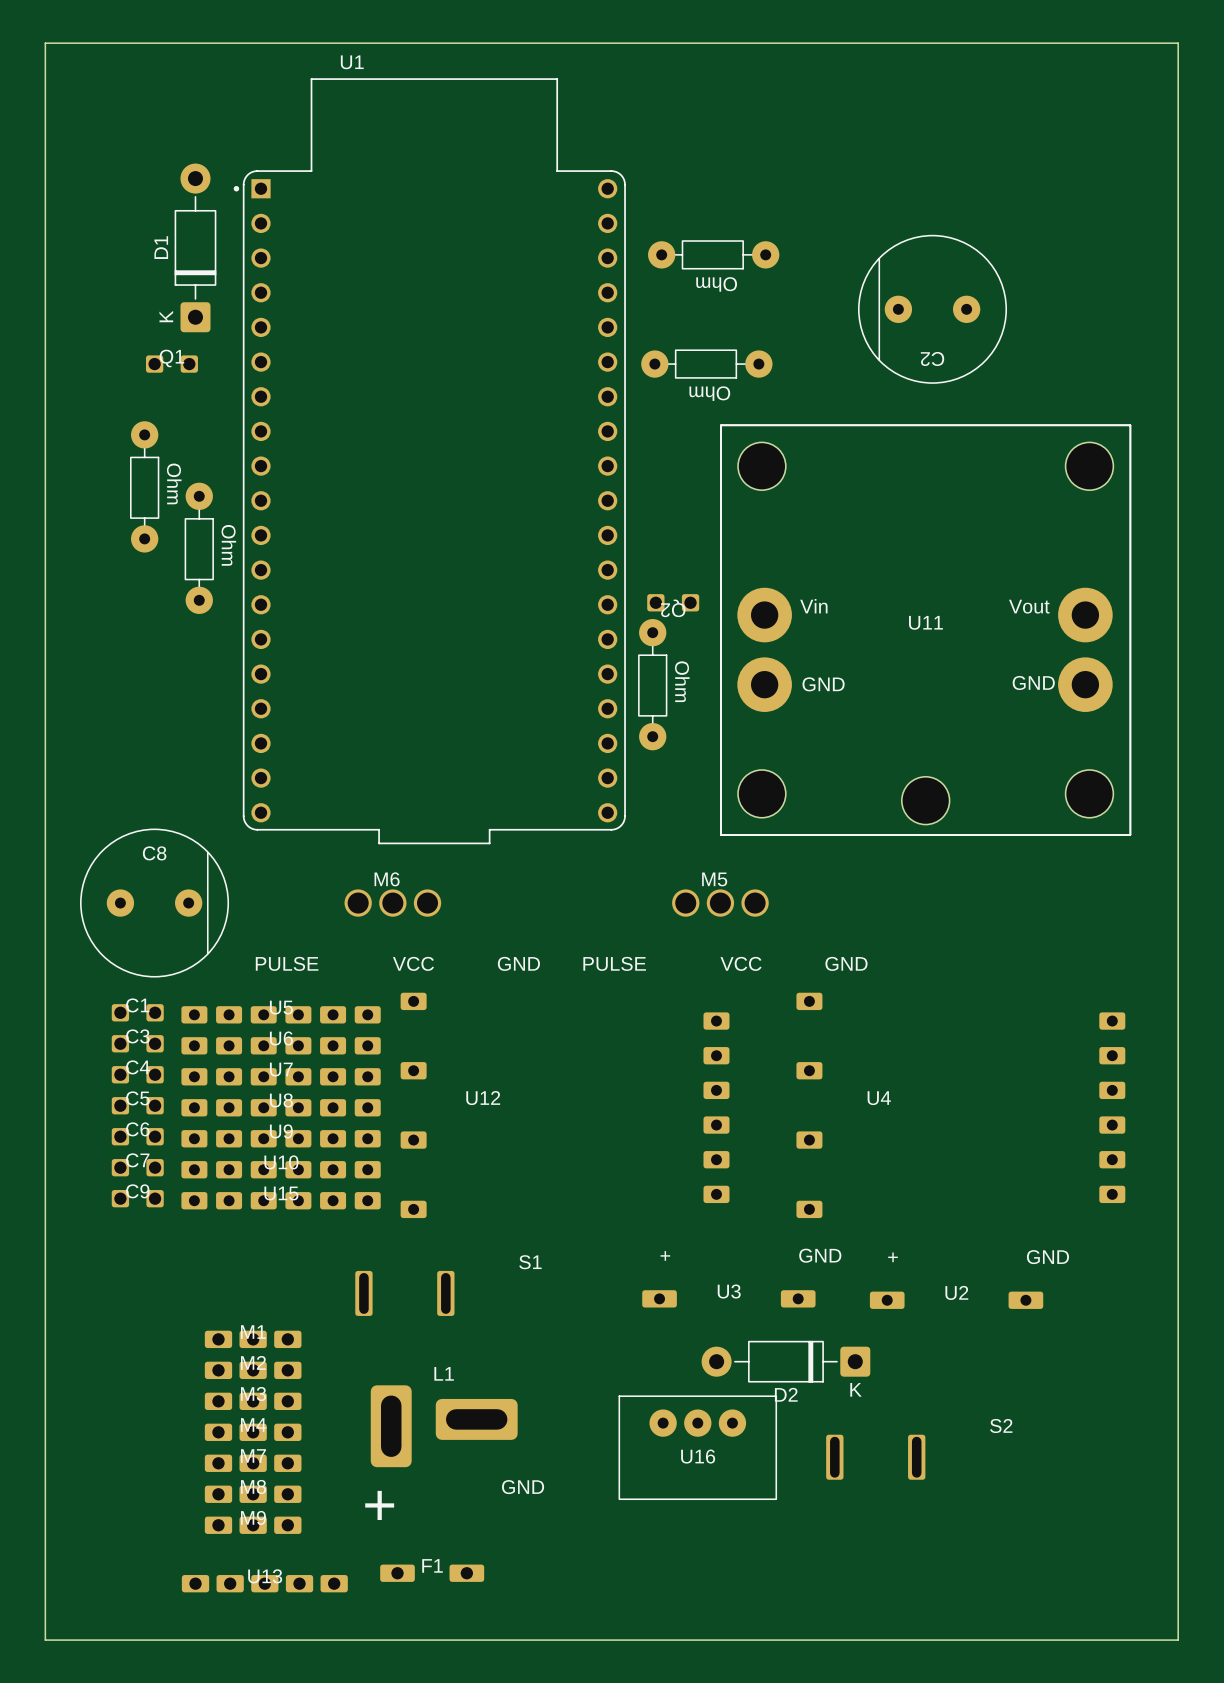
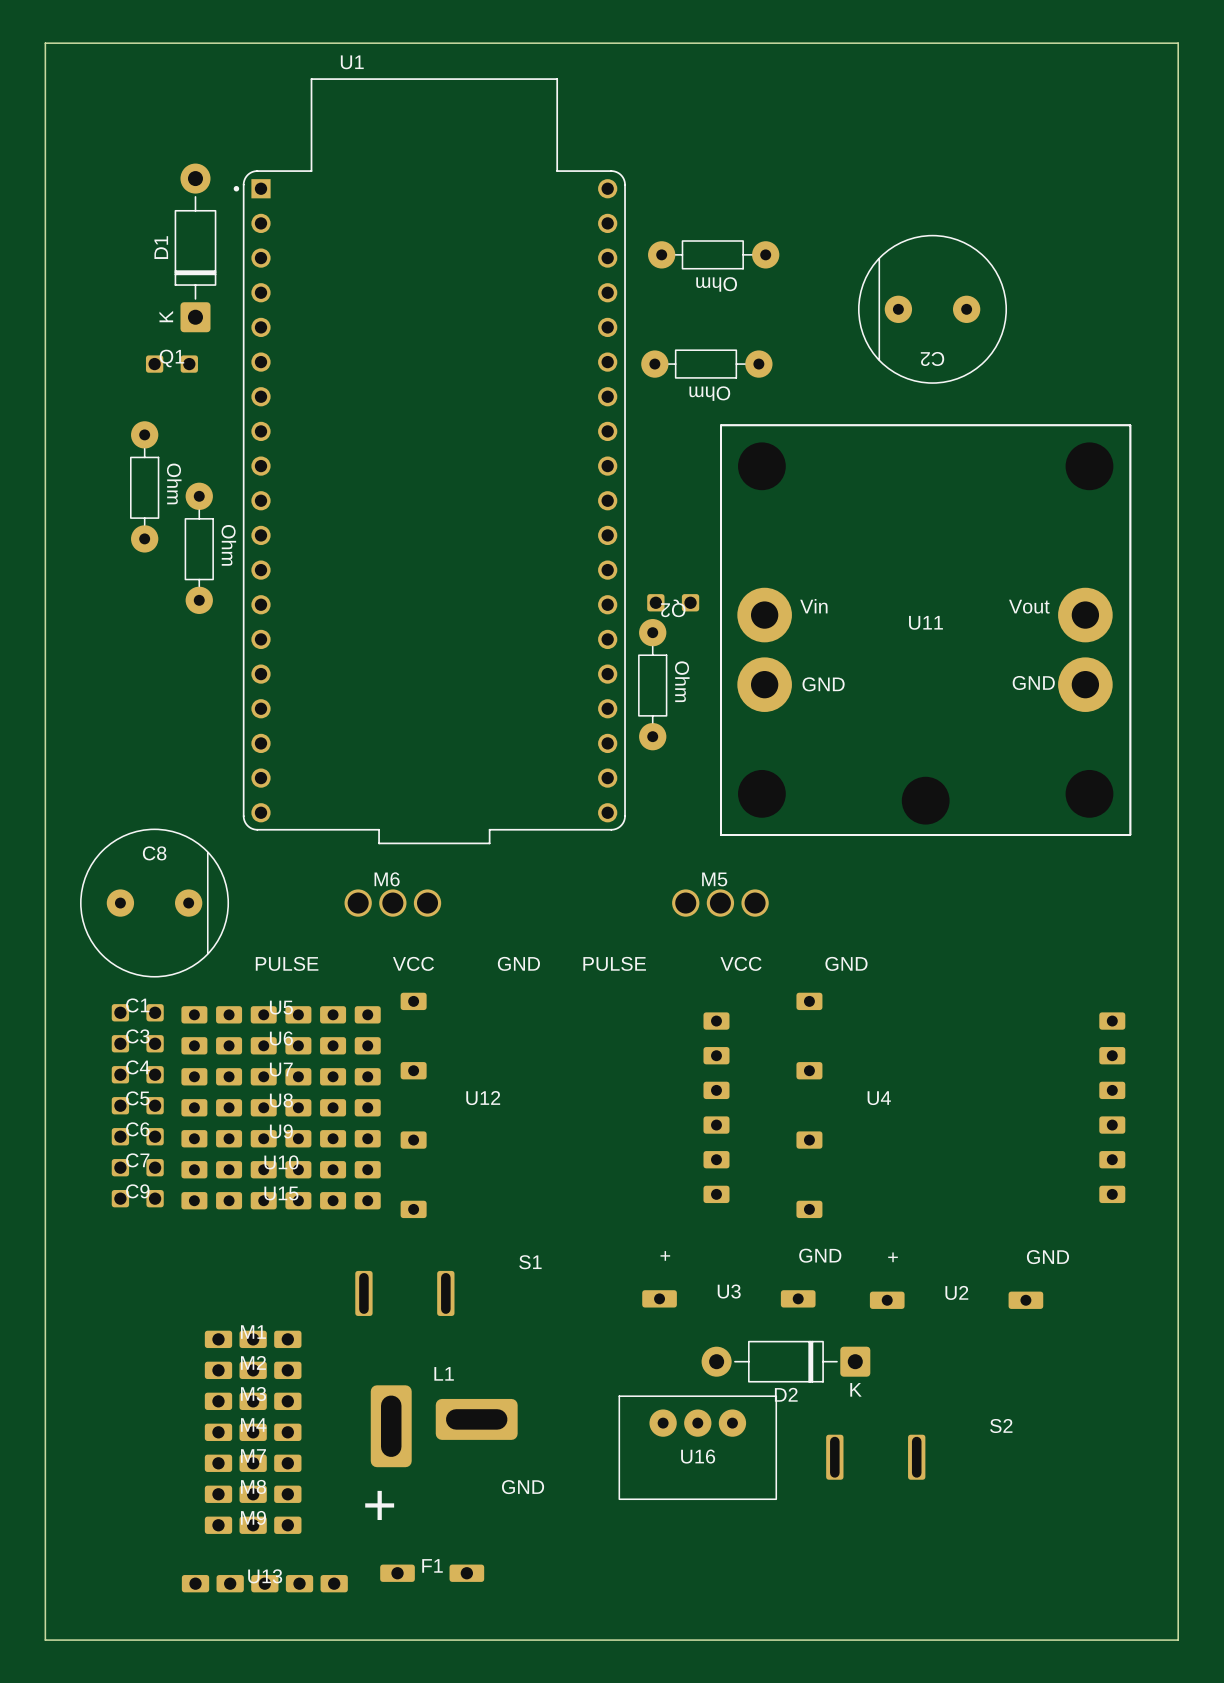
U11 footprint: [720, 424, 1132, 836] -> [720, 424, 1132, 836]

